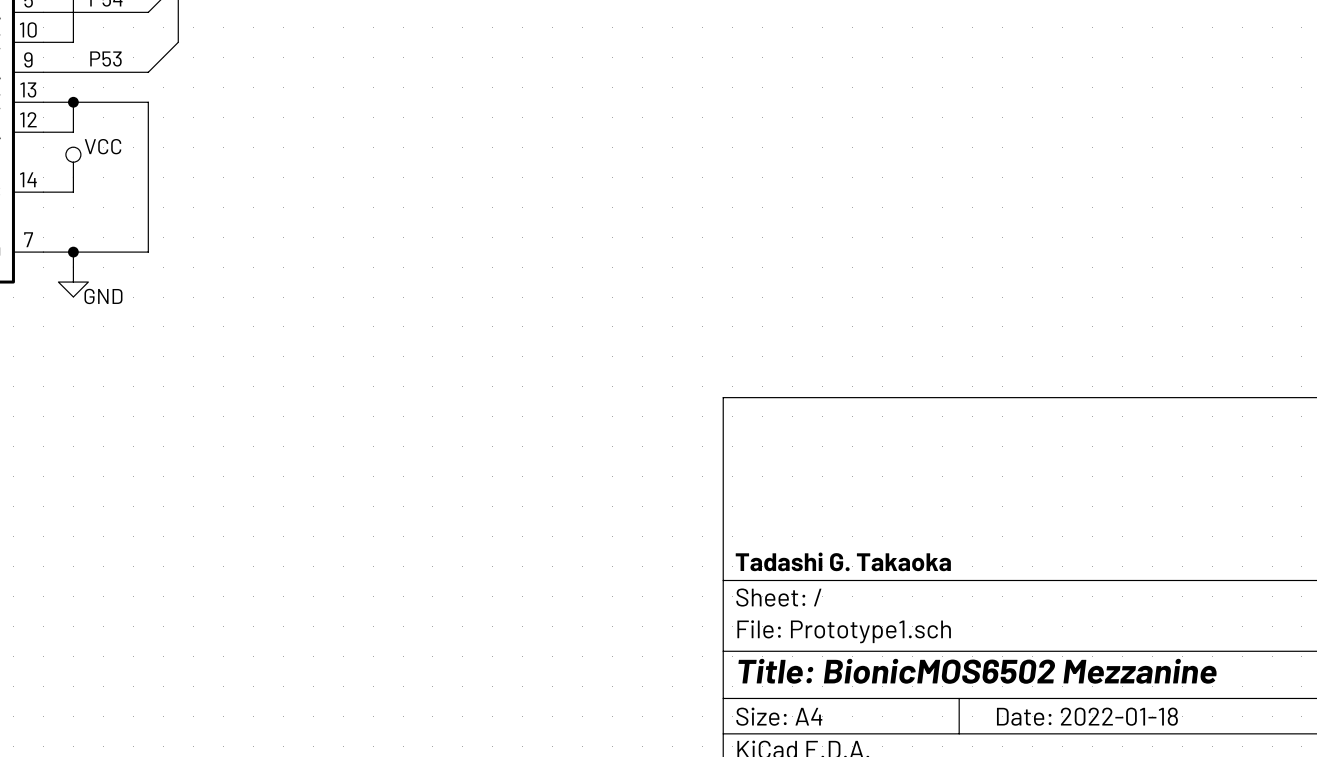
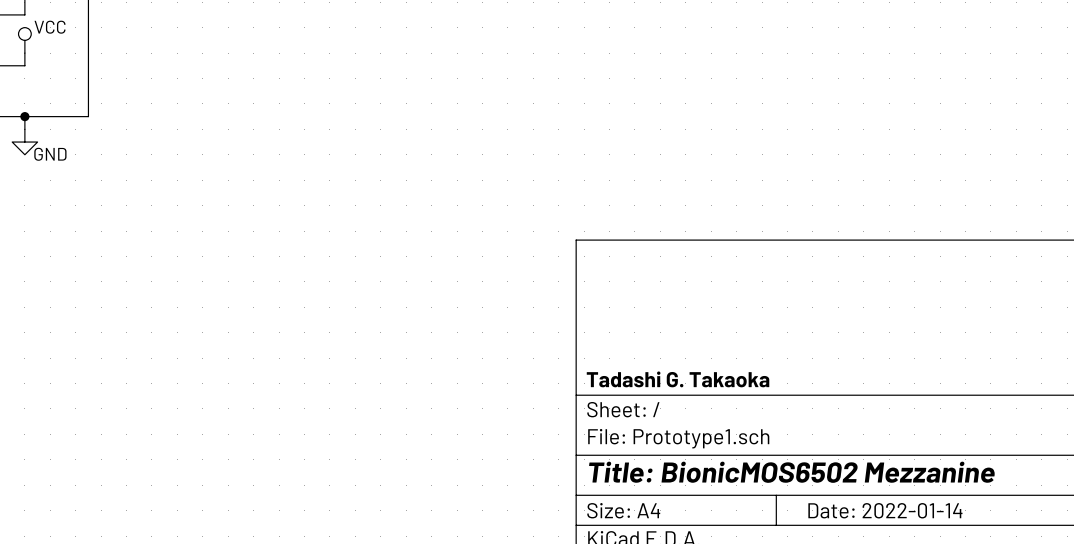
title block: Date: 2022-01-18 (1087, 716) -> Date: 2022-01-14 (885, 510)

